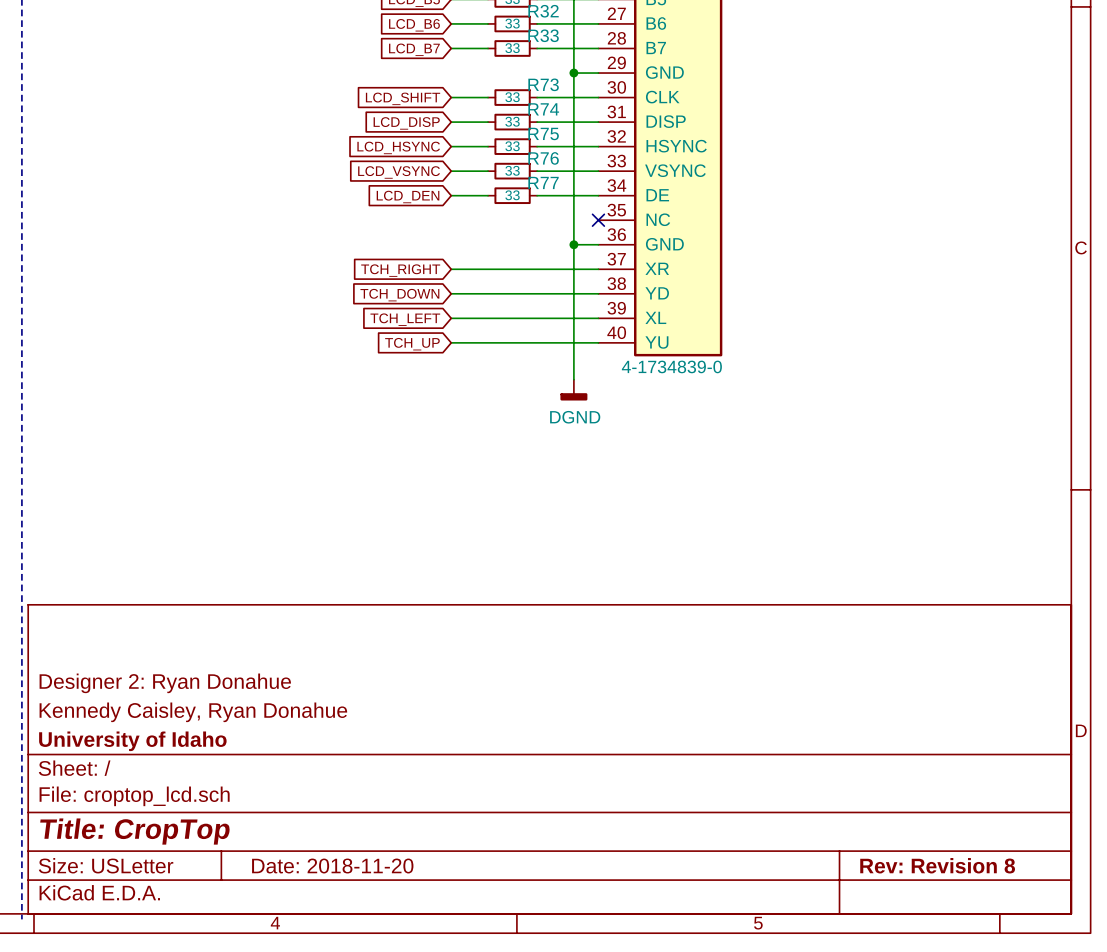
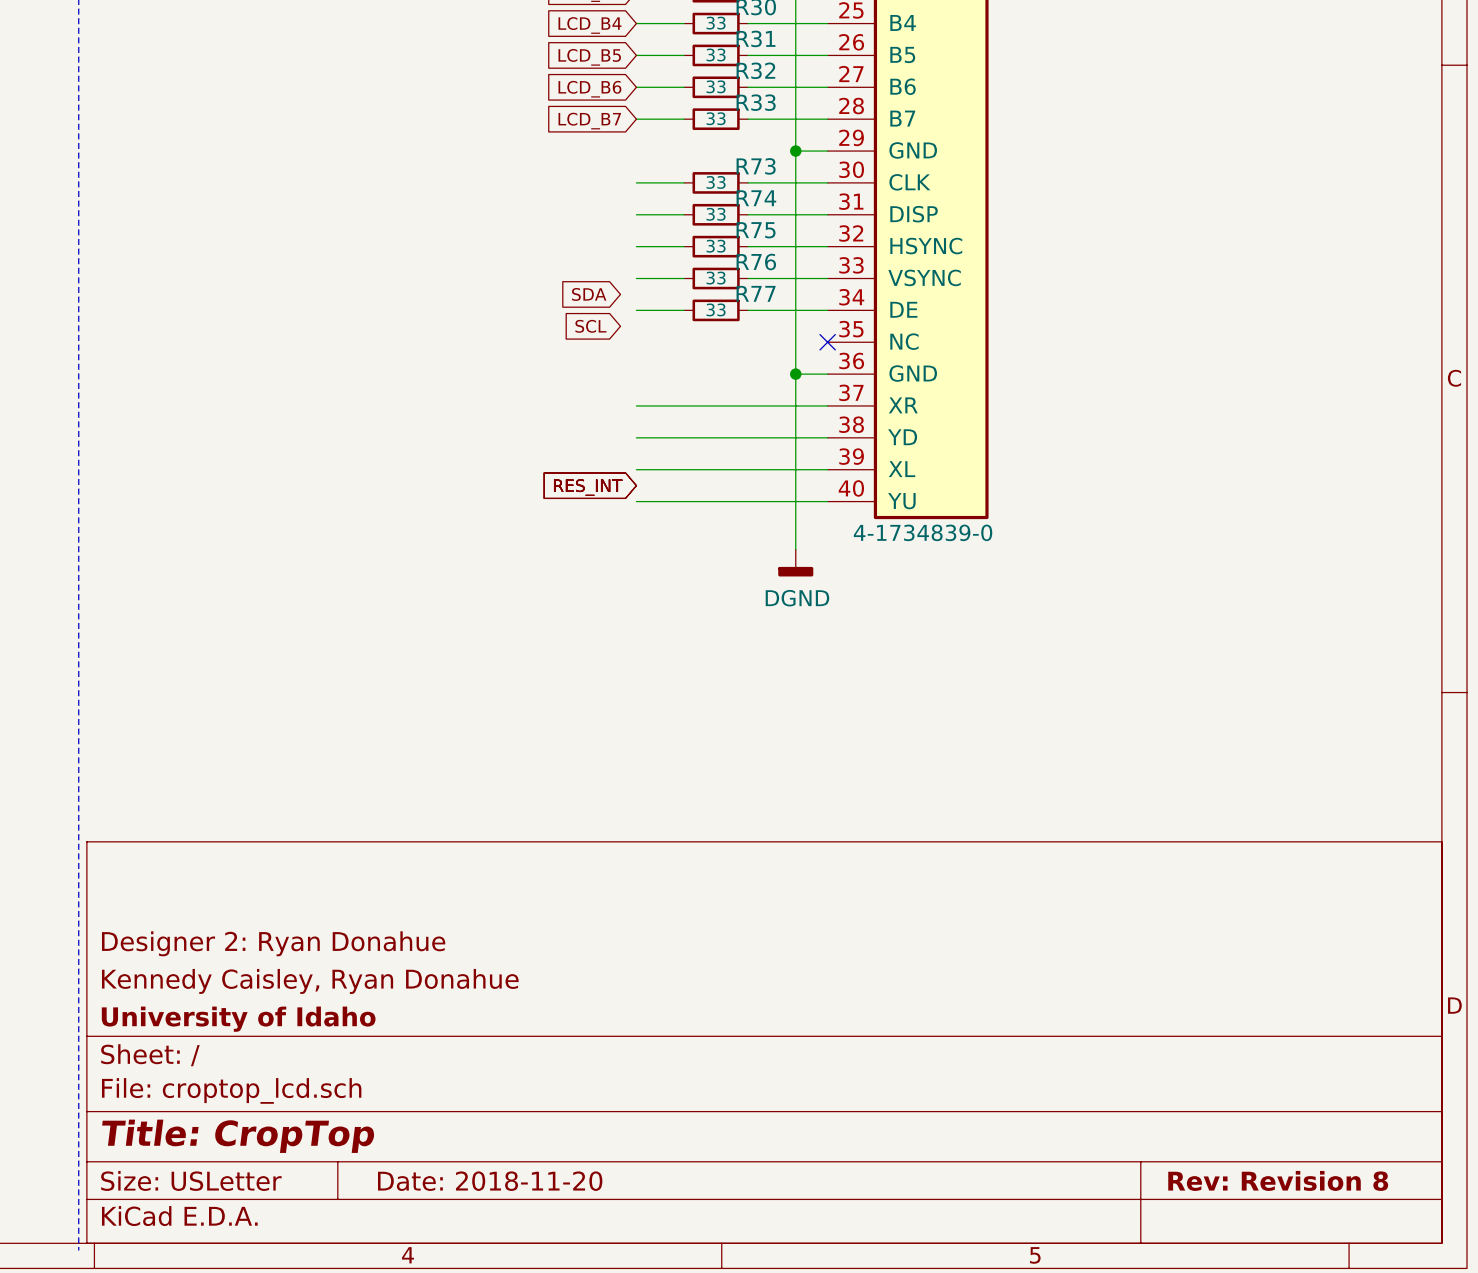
global label: LCD_SHIFT (403, 98) -> none
global label: LCD_DISP (406, 123) -> none
global label: LCD_HSYNC (398, 147) -> none
global label: LCD_VSYNC (399, 172) -> none
global label: none -> SDA (589, 294)
global label: LCD_DEN (408, 196) -> none
global label: none -> SCL (590, 326)
global label: TCH_RIGHT (400, 270) -> none
global label: TCH_DOWN (399, 295) -> none
global label: TCH_LEFT (405, 319) -> none
global label: none -> RES_INT (588, 487)
global label: TCH_UP (412, 344) -> none

